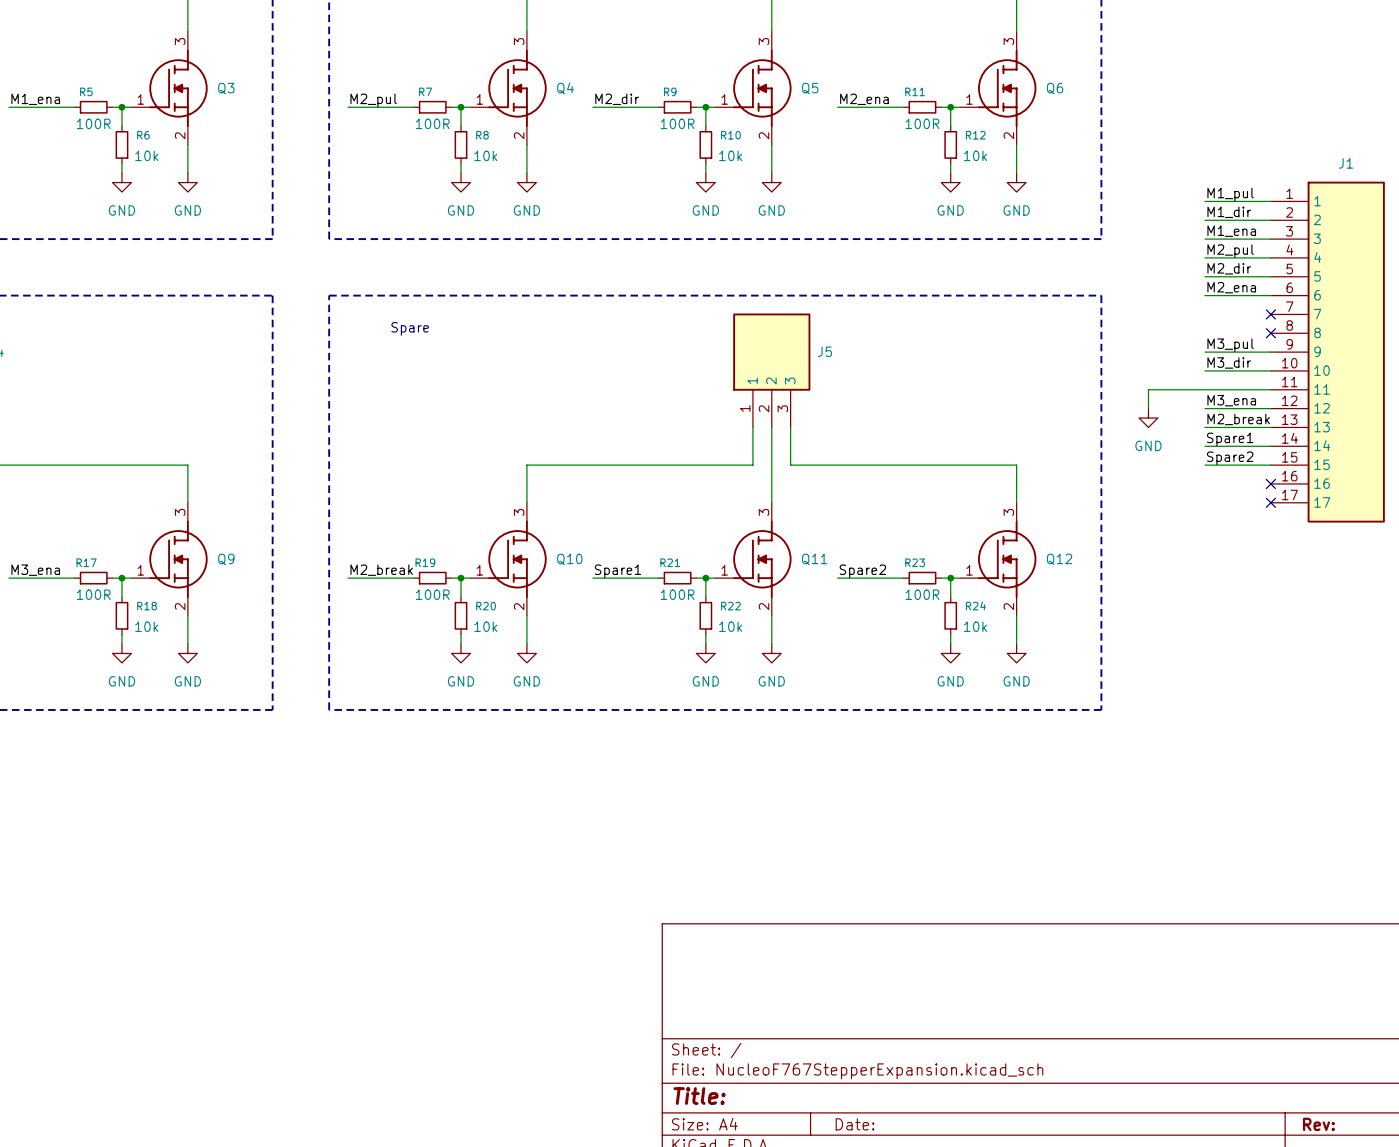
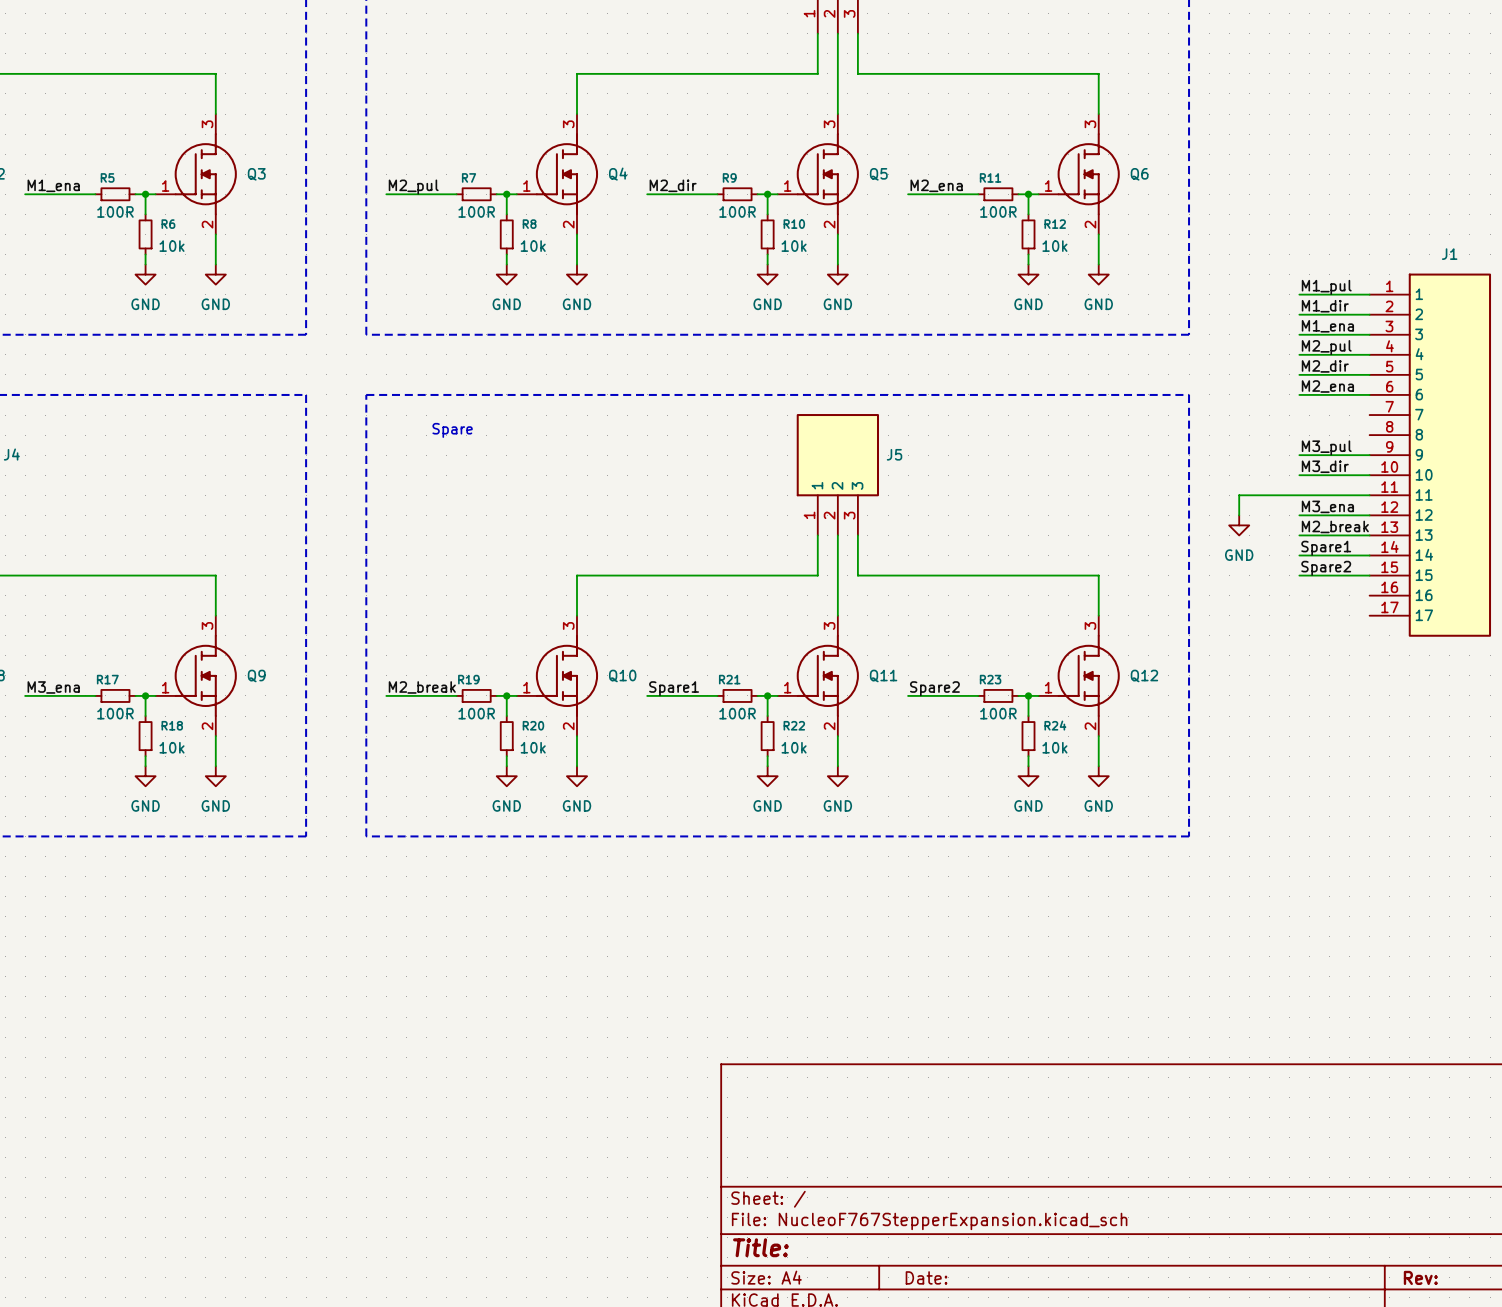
no-connect mark: (1270, 314) -> none
no-connect mark: (1270, 333) -> none
no-connect mark: (1270, 483) -> none
no-connect mark: (1270, 502) -> none

